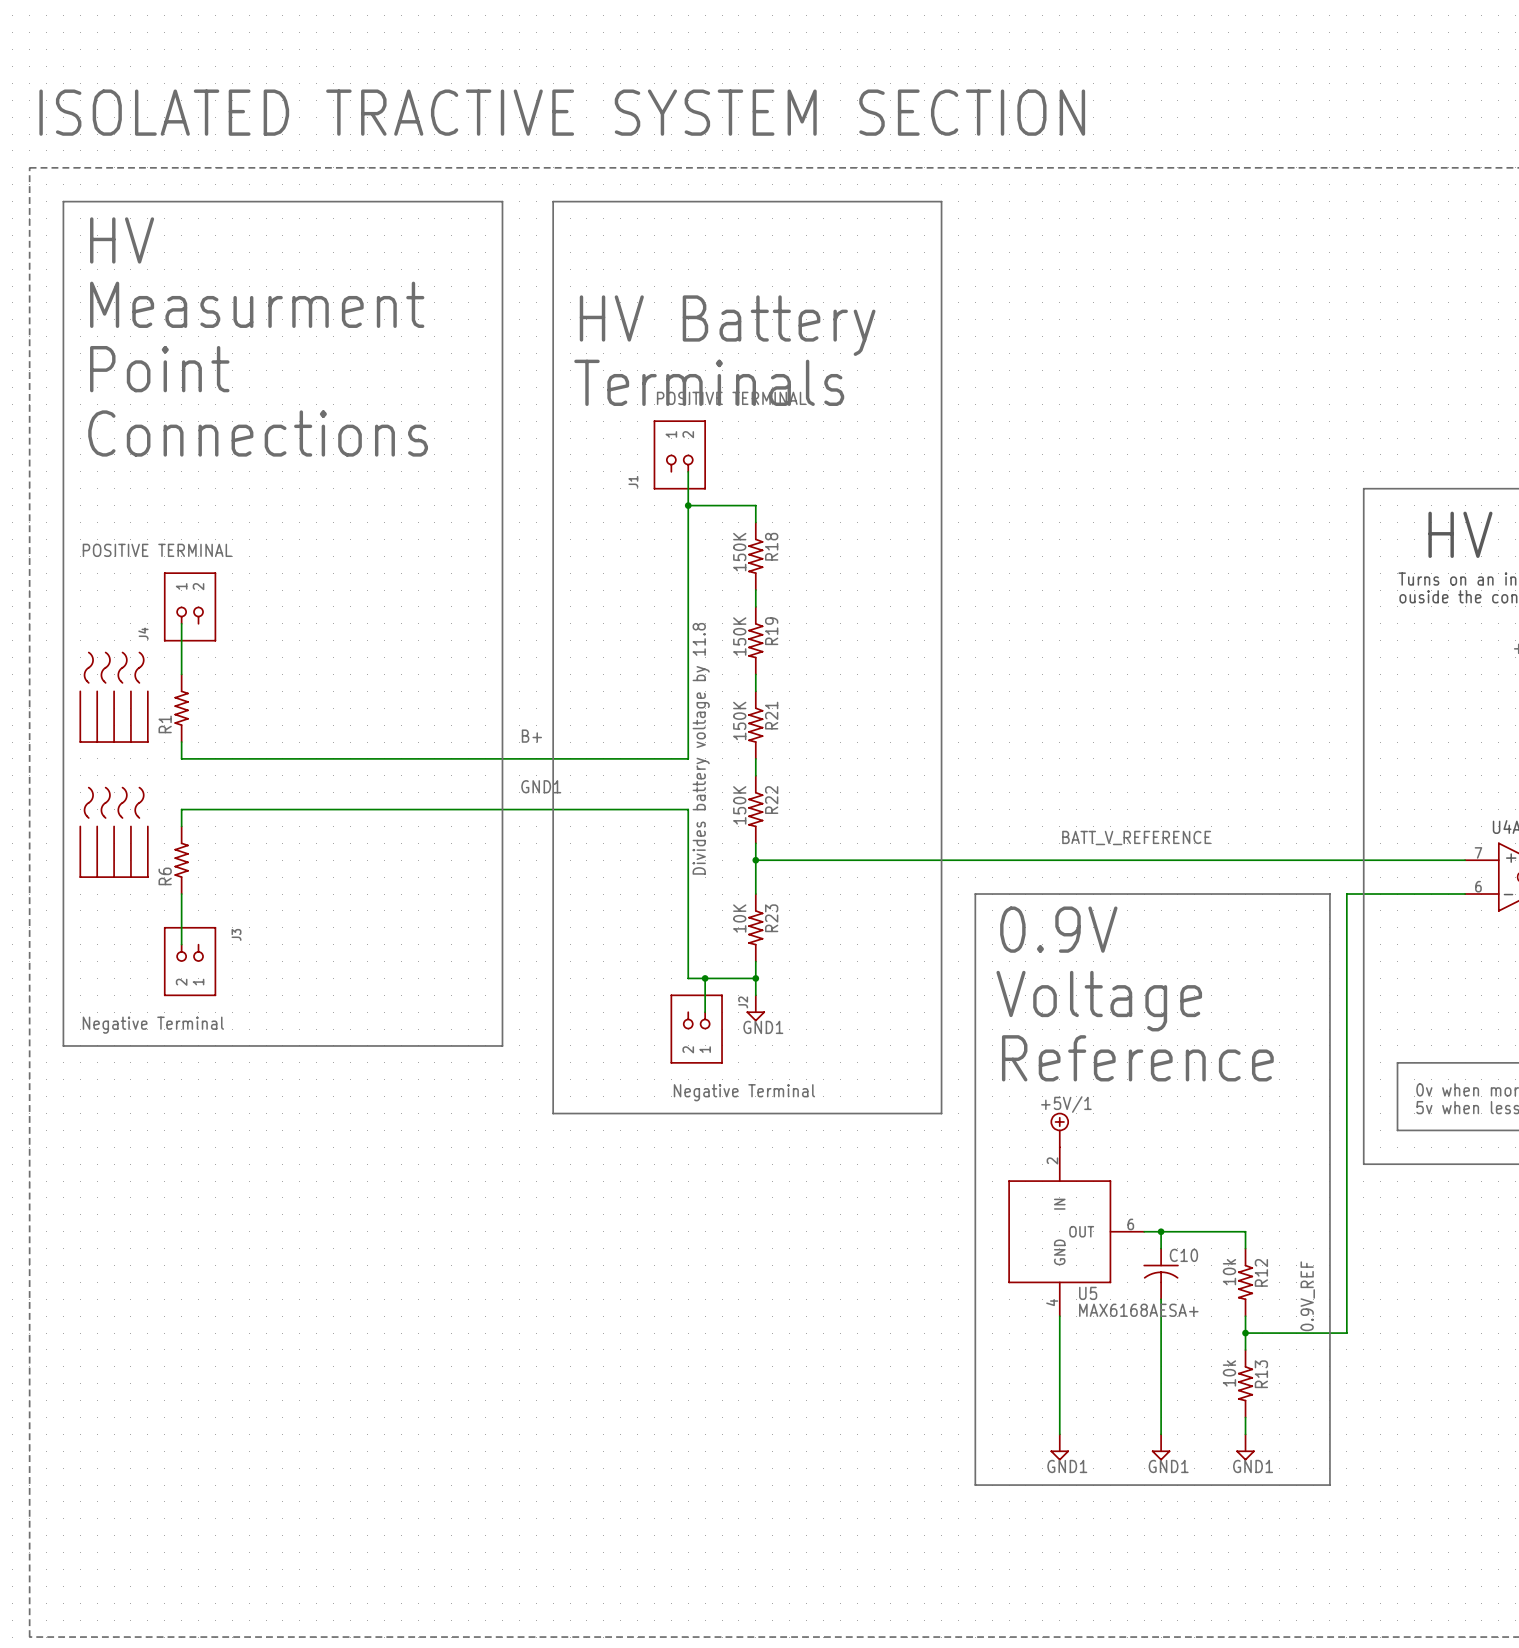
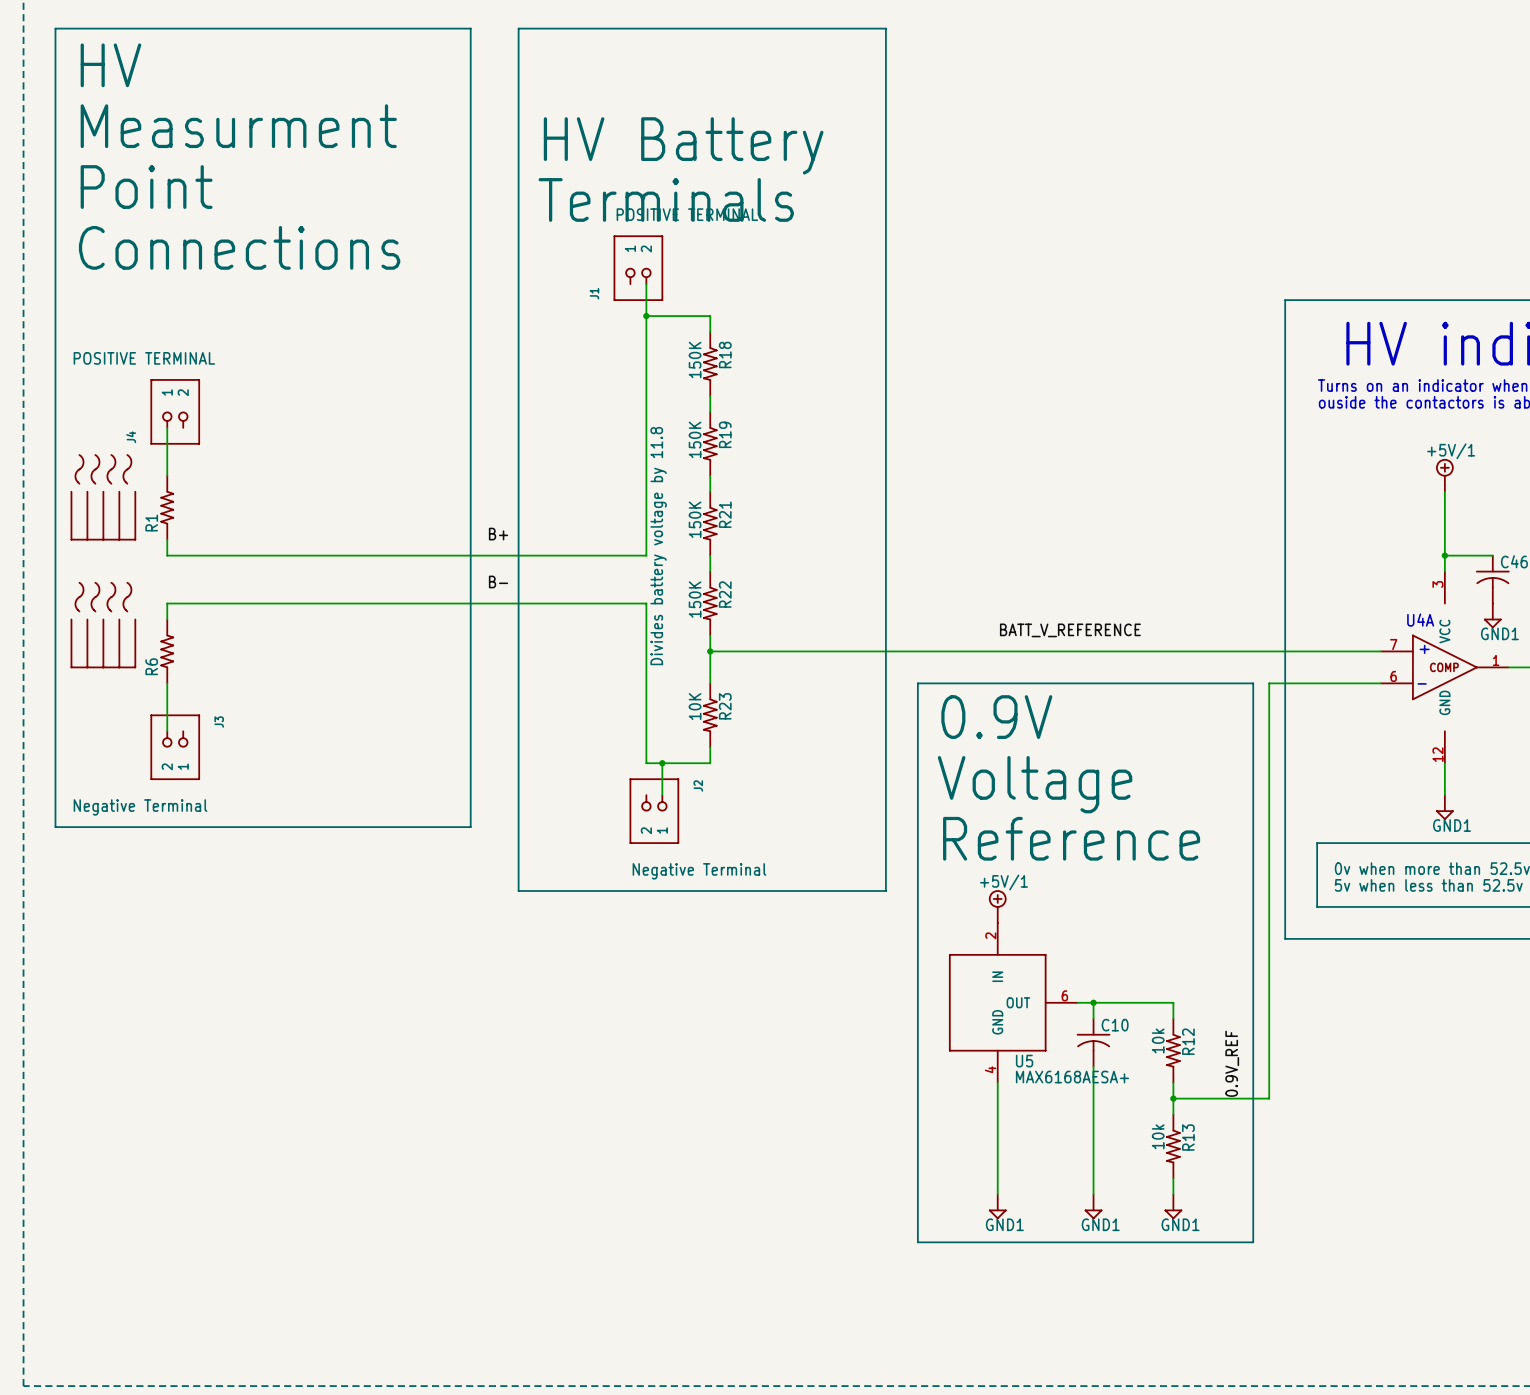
label: GND1 (541, 786) -> B- (498, 581)
wire: (755, 978) (755, 995) -> none
junction: (755, 978) -> none
power symbol: GND1 (755, 1008) -> none

